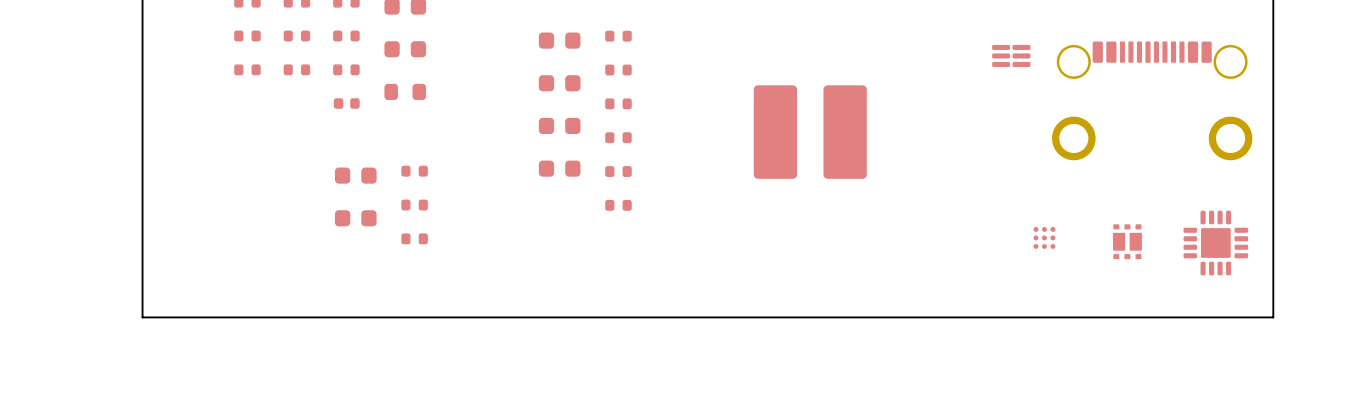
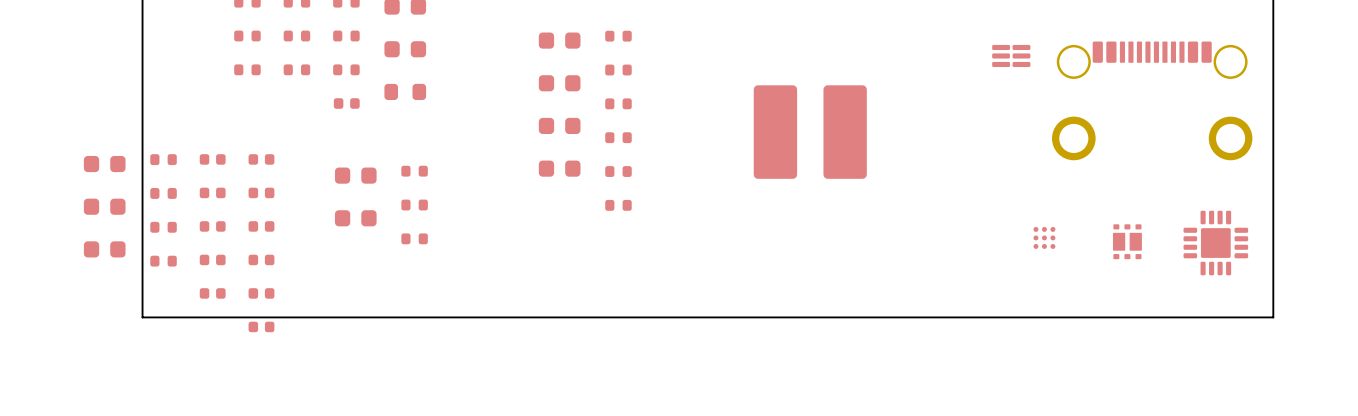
part: none -> (163, 159)
part: none -> (212, 159)
part: none -> (261, 159)
part: none -> (104, 164)
part: none -> (212, 192)
part: none -> (261, 192)
part: none -> (163, 193)
part: none -> (104, 206)
part: none -> (212, 226)
part: none -> (261, 226)
part: none -> (163, 227)
part: none -> (104, 249)
part: none -> (212, 259)
part: none -> (261, 259)
part: none -> (163, 261)
part: none -> (212, 293)
part: none -> (261, 293)
part: none -> (261, 326)

